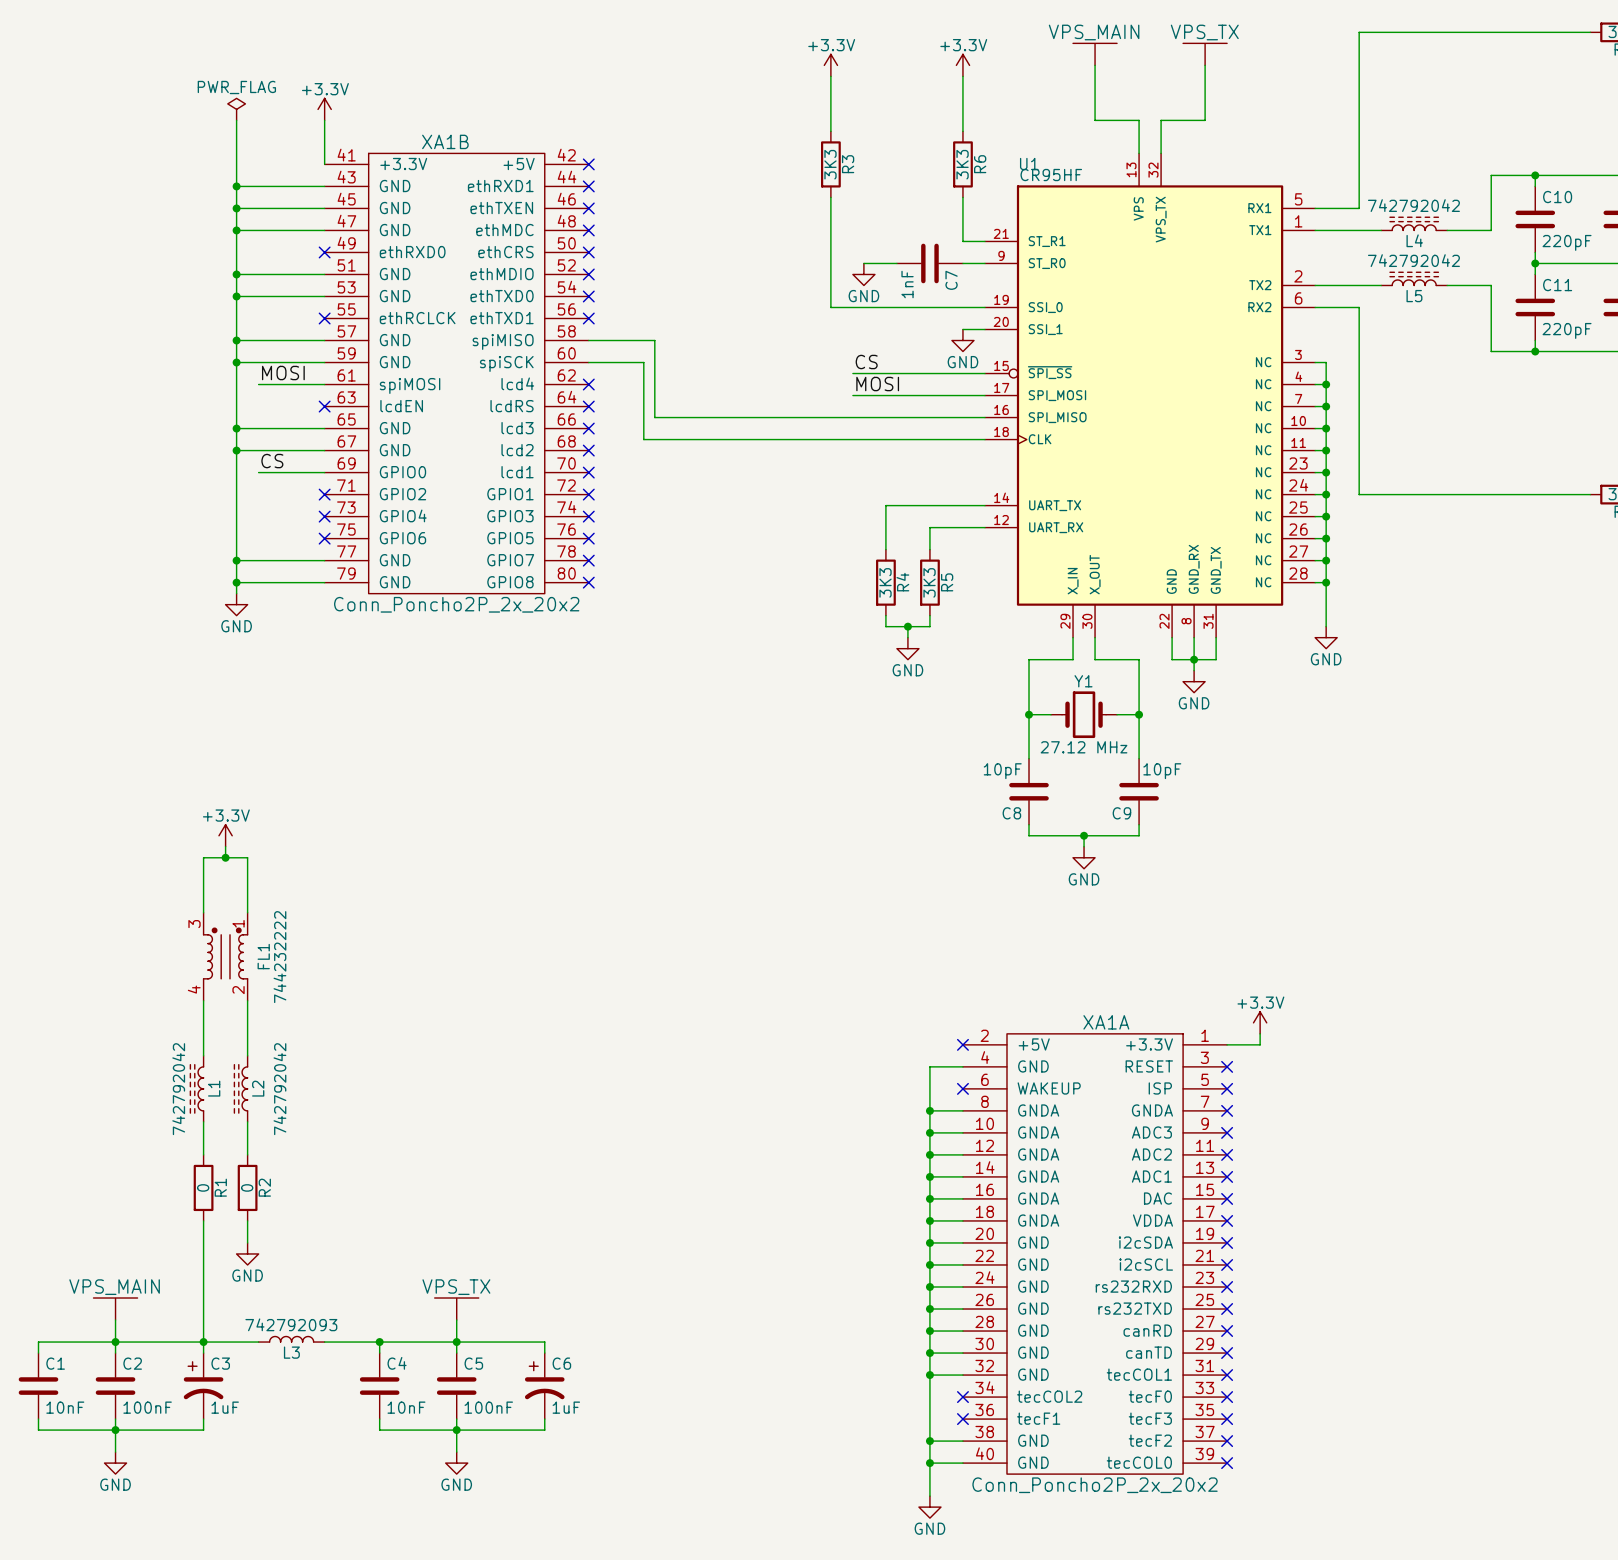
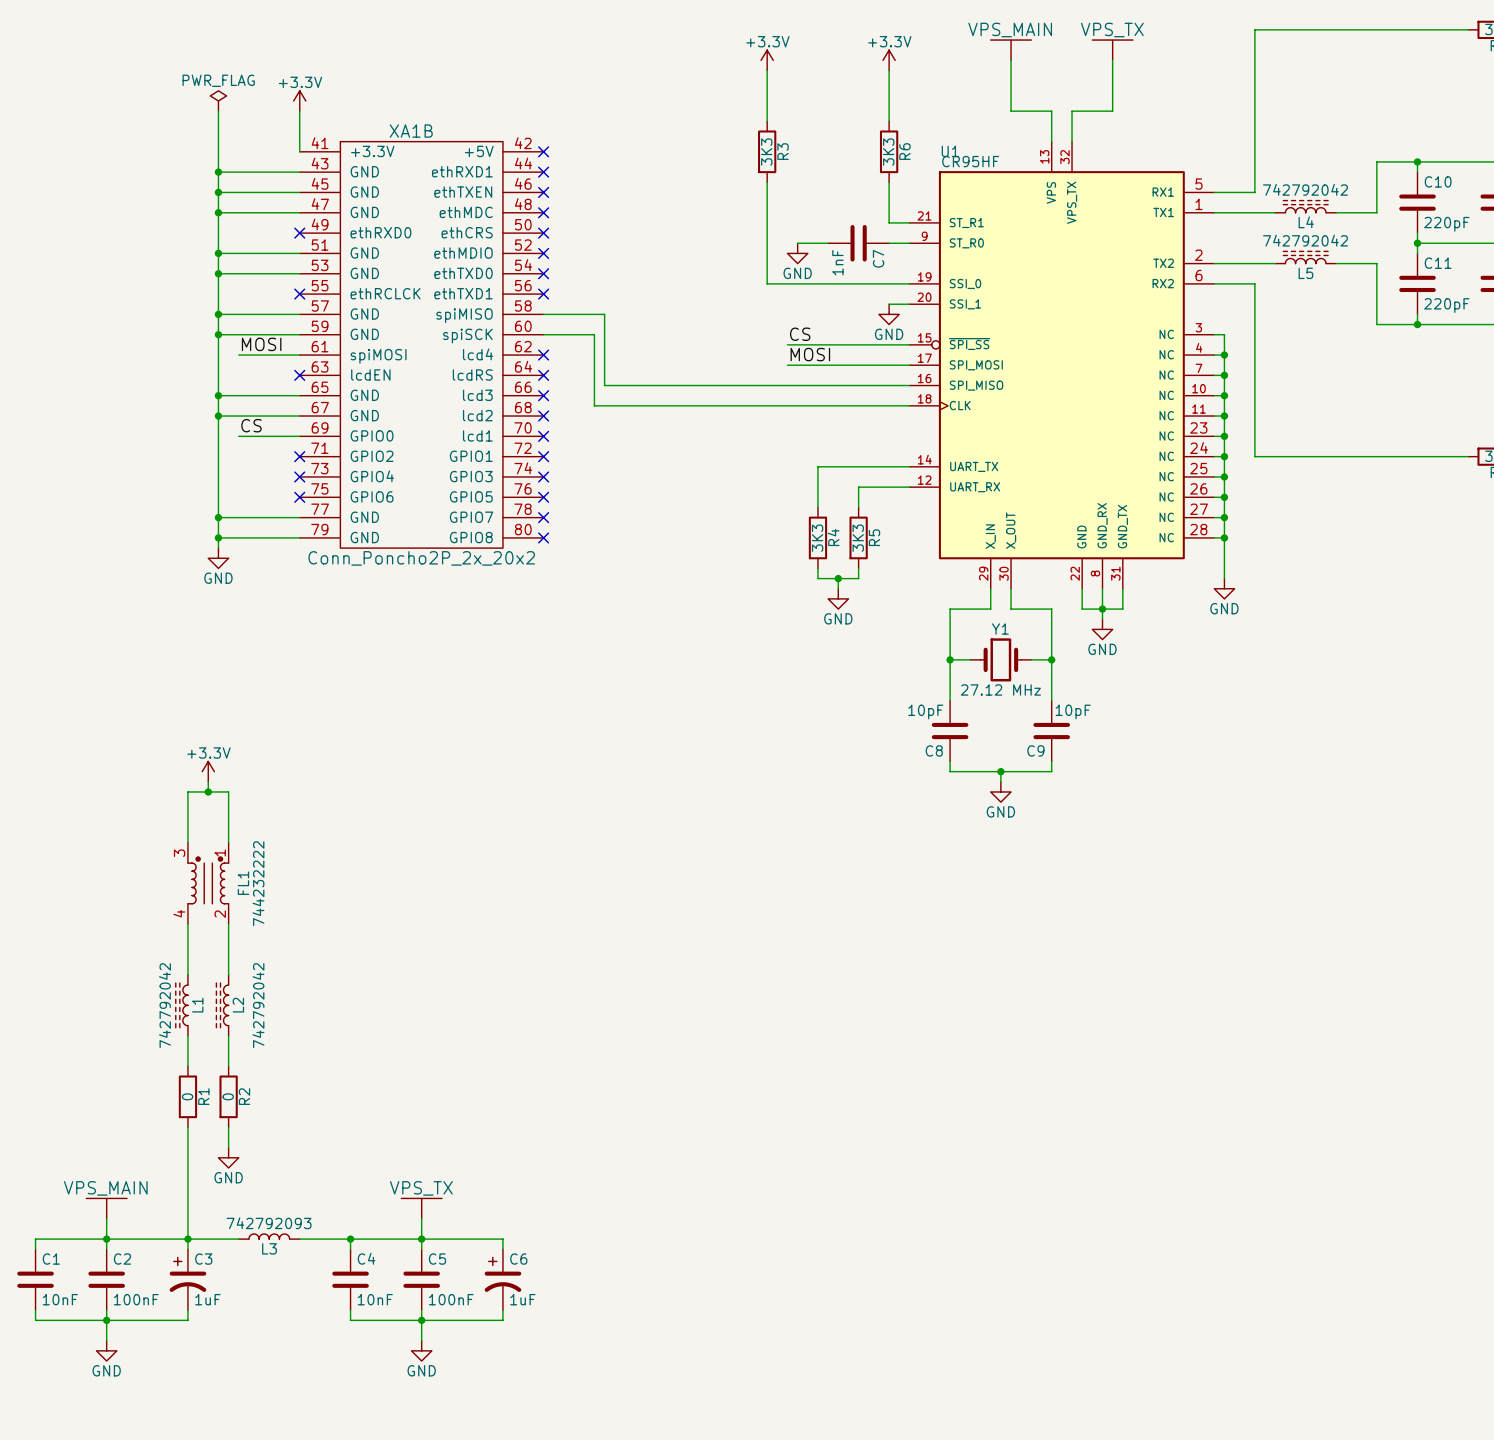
power symbol: +3.3V (1260, 1022) -> none
wire: (1260, 1033) (1260, 1044) (1227, 1044) -> none
no-connect mark: (962, 1044) -> none
wire: (962, 1066) (929, 1066) (929, 1496) -> none
no-connect mark: (1227, 1066) -> none
no-connect mark: (962, 1088) -> none
no-connect mark: (1227, 1088) -> none
wire: (929, 1110) (962, 1110) -> none
junction: (929, 1110) -> none
no-connect mark: (1227, 1110) -> none
wire: (929, 1132) (962, 1132) -> none
junction: (929, 1132) -> none
no-connect mark: (1227, 1132) -> none
wire: (929, 1154) (962, 1154) -> none
junction: (929, 1154) -> none
no-connect mark: (1227, 1154) -> none
wire: (929, 1176) (962, 1176) -> none
junction: (929, 1176) -> none
no-connect mark: (1227, 1176) -> none
wire: (929, 1198) (962, 1198) -> none
junction: (929, 1198) -> none
no-connect mark: (1227, 1198) -> none
wire: (929, 1220) (962, 1220) -> none
junction: (929, 1220) -> none
no-connect mark: (1227, 1220) -> none
wire: (929, 1242) (962, 1242) -> none
junction: (929, 1242) -> none
no-connect mark: (1227, 1242) -> none
XA1A: Conn_Poncho2P_2x_20x2 (1095, 1253) -> none
wire: (929, 1264) (962, 1264) -> none
junction: (929, 1264) -> none
no-connect mark: (1227, 1264) -> none
wire: (929, 1286) (962, 1286) -> none
junction: (929, 1286) -> none
no-connect mark: (1227, 1286) -> none
wire: (929, 1309) (962, 1309) -> none
junction: (929, 1309) -> none
no-connect mark: (1227, 1309) -> none
wire: (929, 1331) (962, 1331) -> none
junction: (929, 1331) -> none
no-connect mark: (1227, 1331) -> none
wire: (929, 1353) (962, 1353) -> none
junction: (929, 1353) -> none
no-connect mark: (1227, 1353) -> none
wire: (929, 1375) (962, 1375) -> none
junction: (929, 1375) -> none
no-connect mark: (1227, 1375) -> none
no-connect mark: (962, 1397) -> none
no-connect mark: (1227, 1397) -> none
no-connect mark: (962, 1419) -> none
no-connect mark: (1227, 1419) -> none
wire: (929, 1441) (962, 1441) -> none
junction: (929, 1441) -> none
no-connect mark: (1227, 1441) -> none
wire: (929, 1463) (962, 1463) -> none
junction: (929, 1463) -> none
no-connect mark: (1227, 1463) -> none
power symbol: GND (929, 1507) -> none

